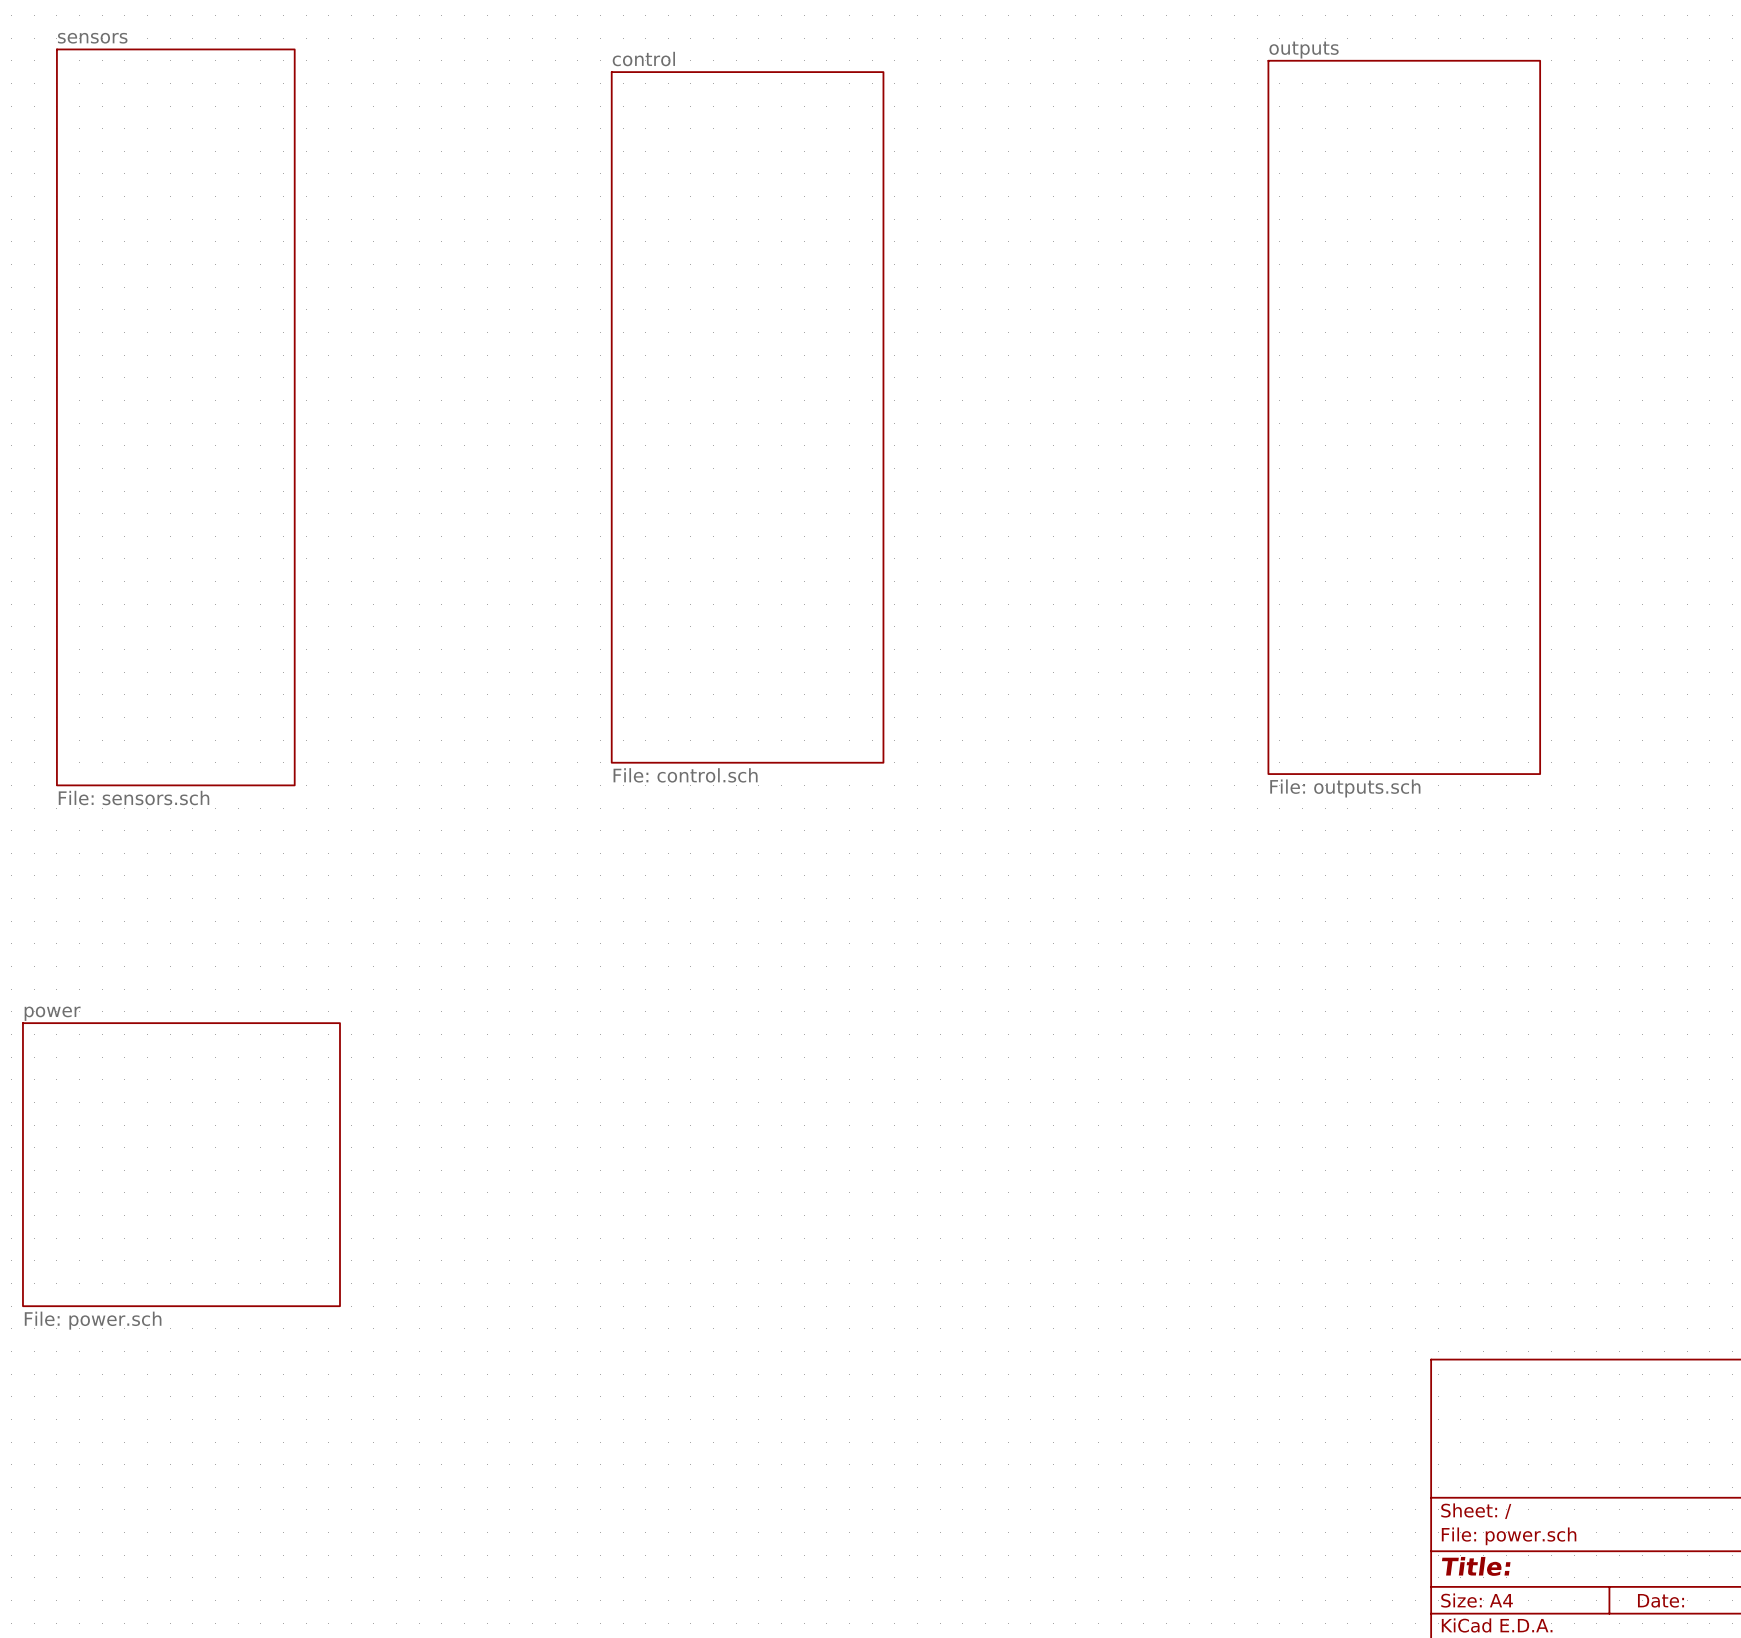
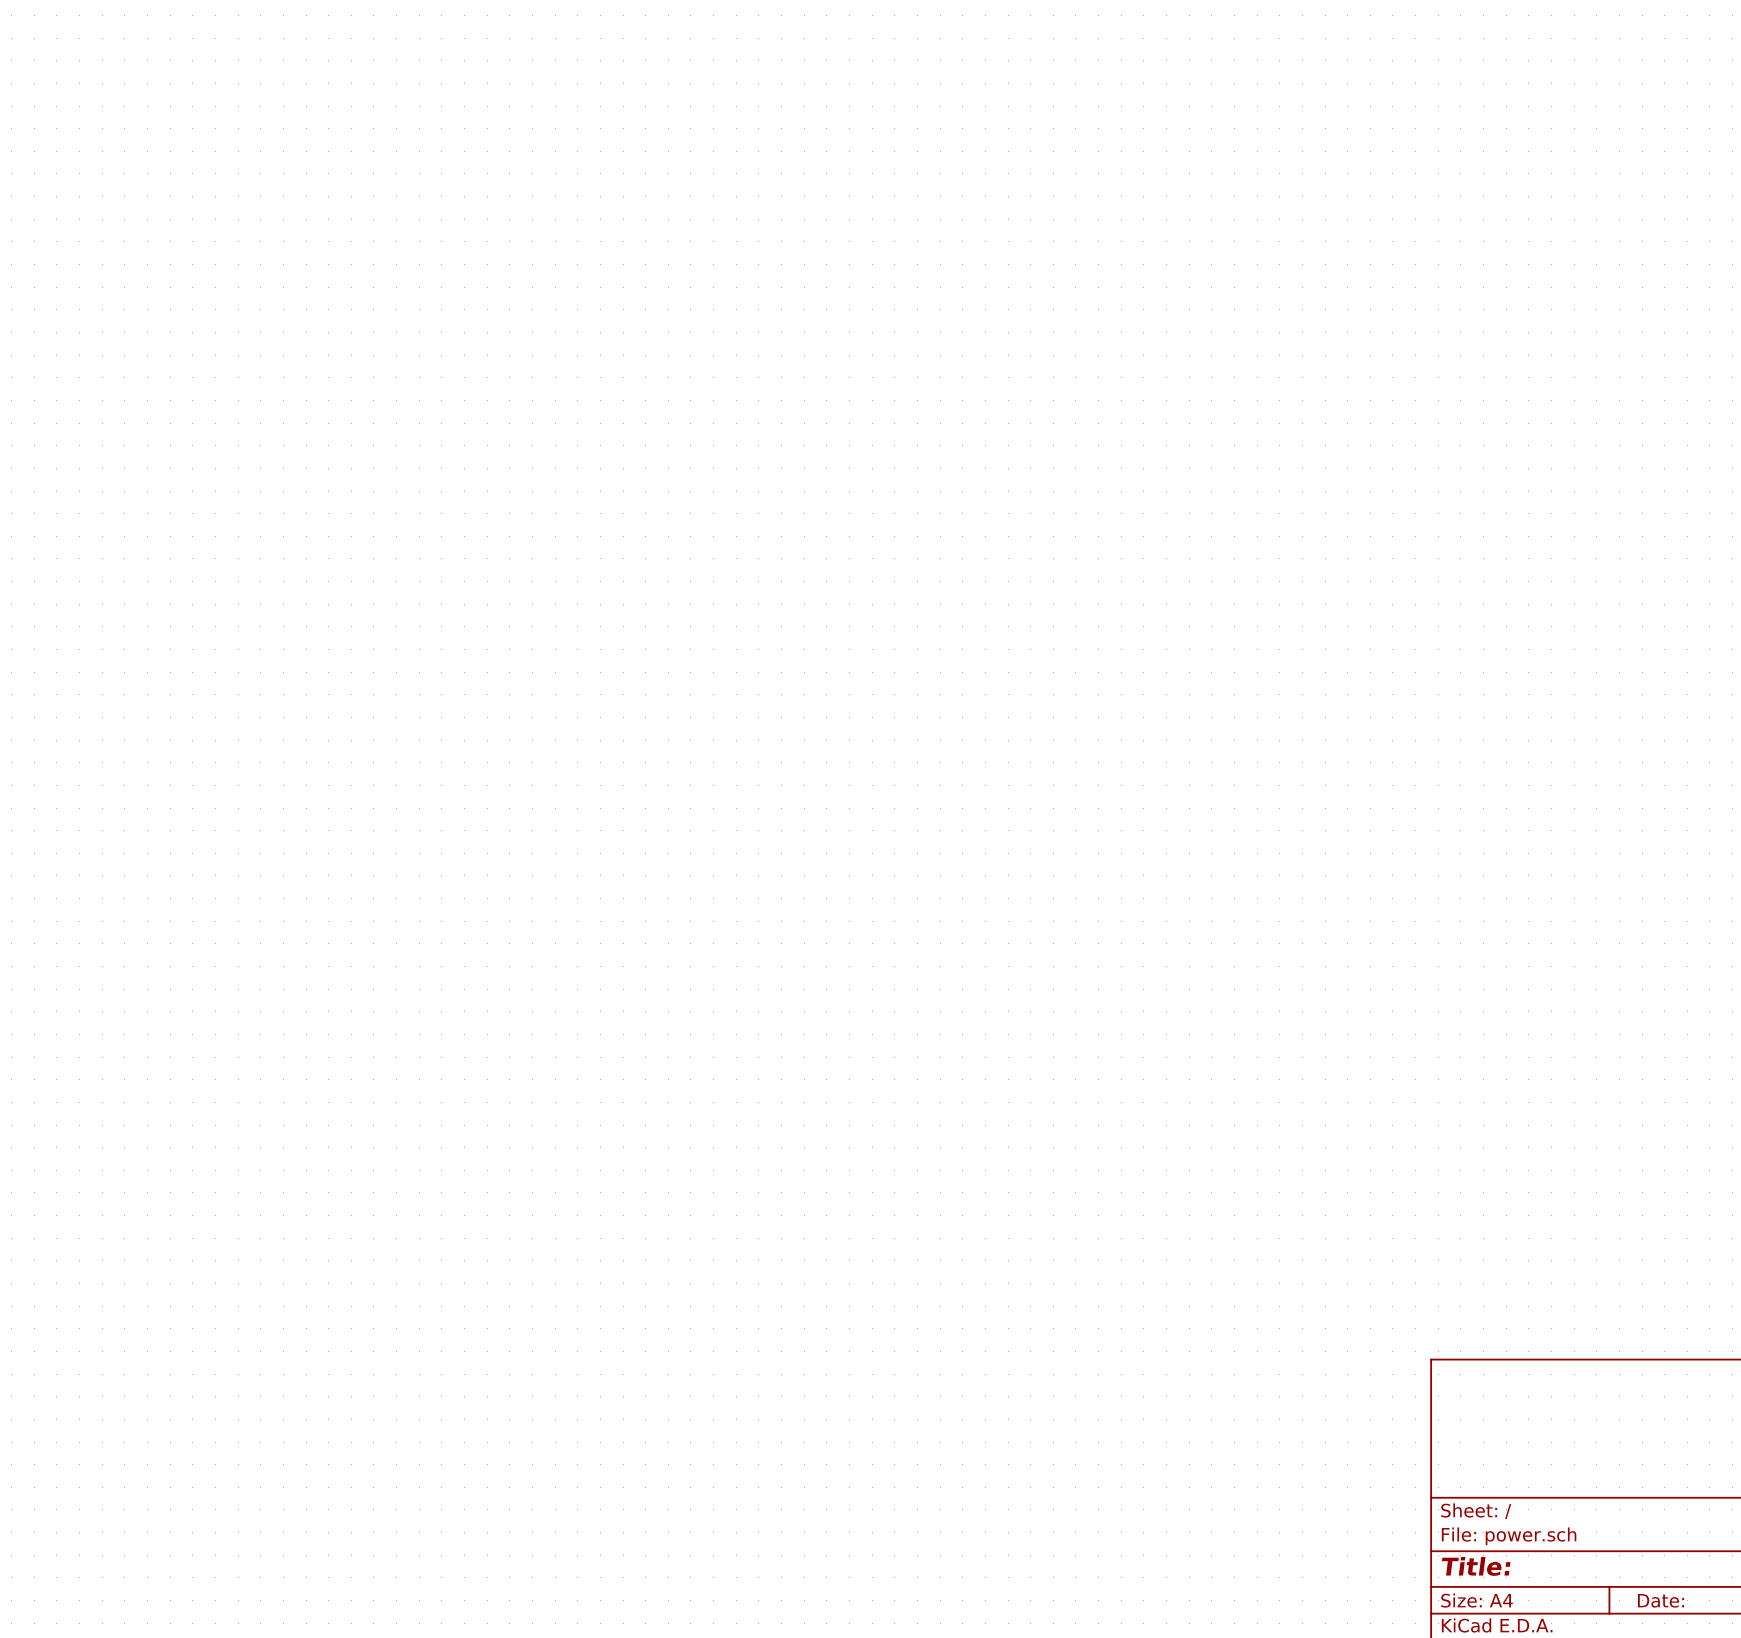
sheet sensors: File: sensors.sch (175, 417) -> none
sheet control: File: control.sch (747, 417) -> none
sheet outputs: File: outputs.sch (1404, 417) -> none
sheet power: File: power.sch (181, 1164) -> none

